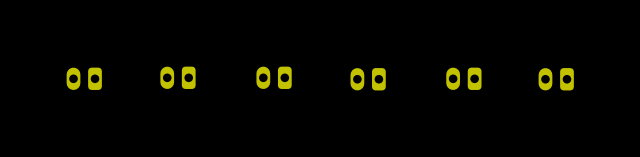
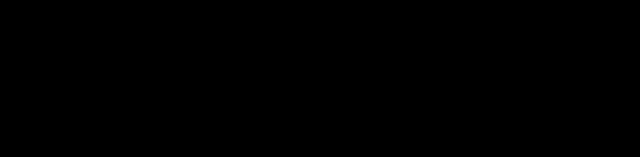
part: (177, 77) -> none
part: (274, 77) -> none
part: (84, 78) -> none
part: (463, 78) -> none
part: (368, 79) -> none
part: (556, 79) -> none

